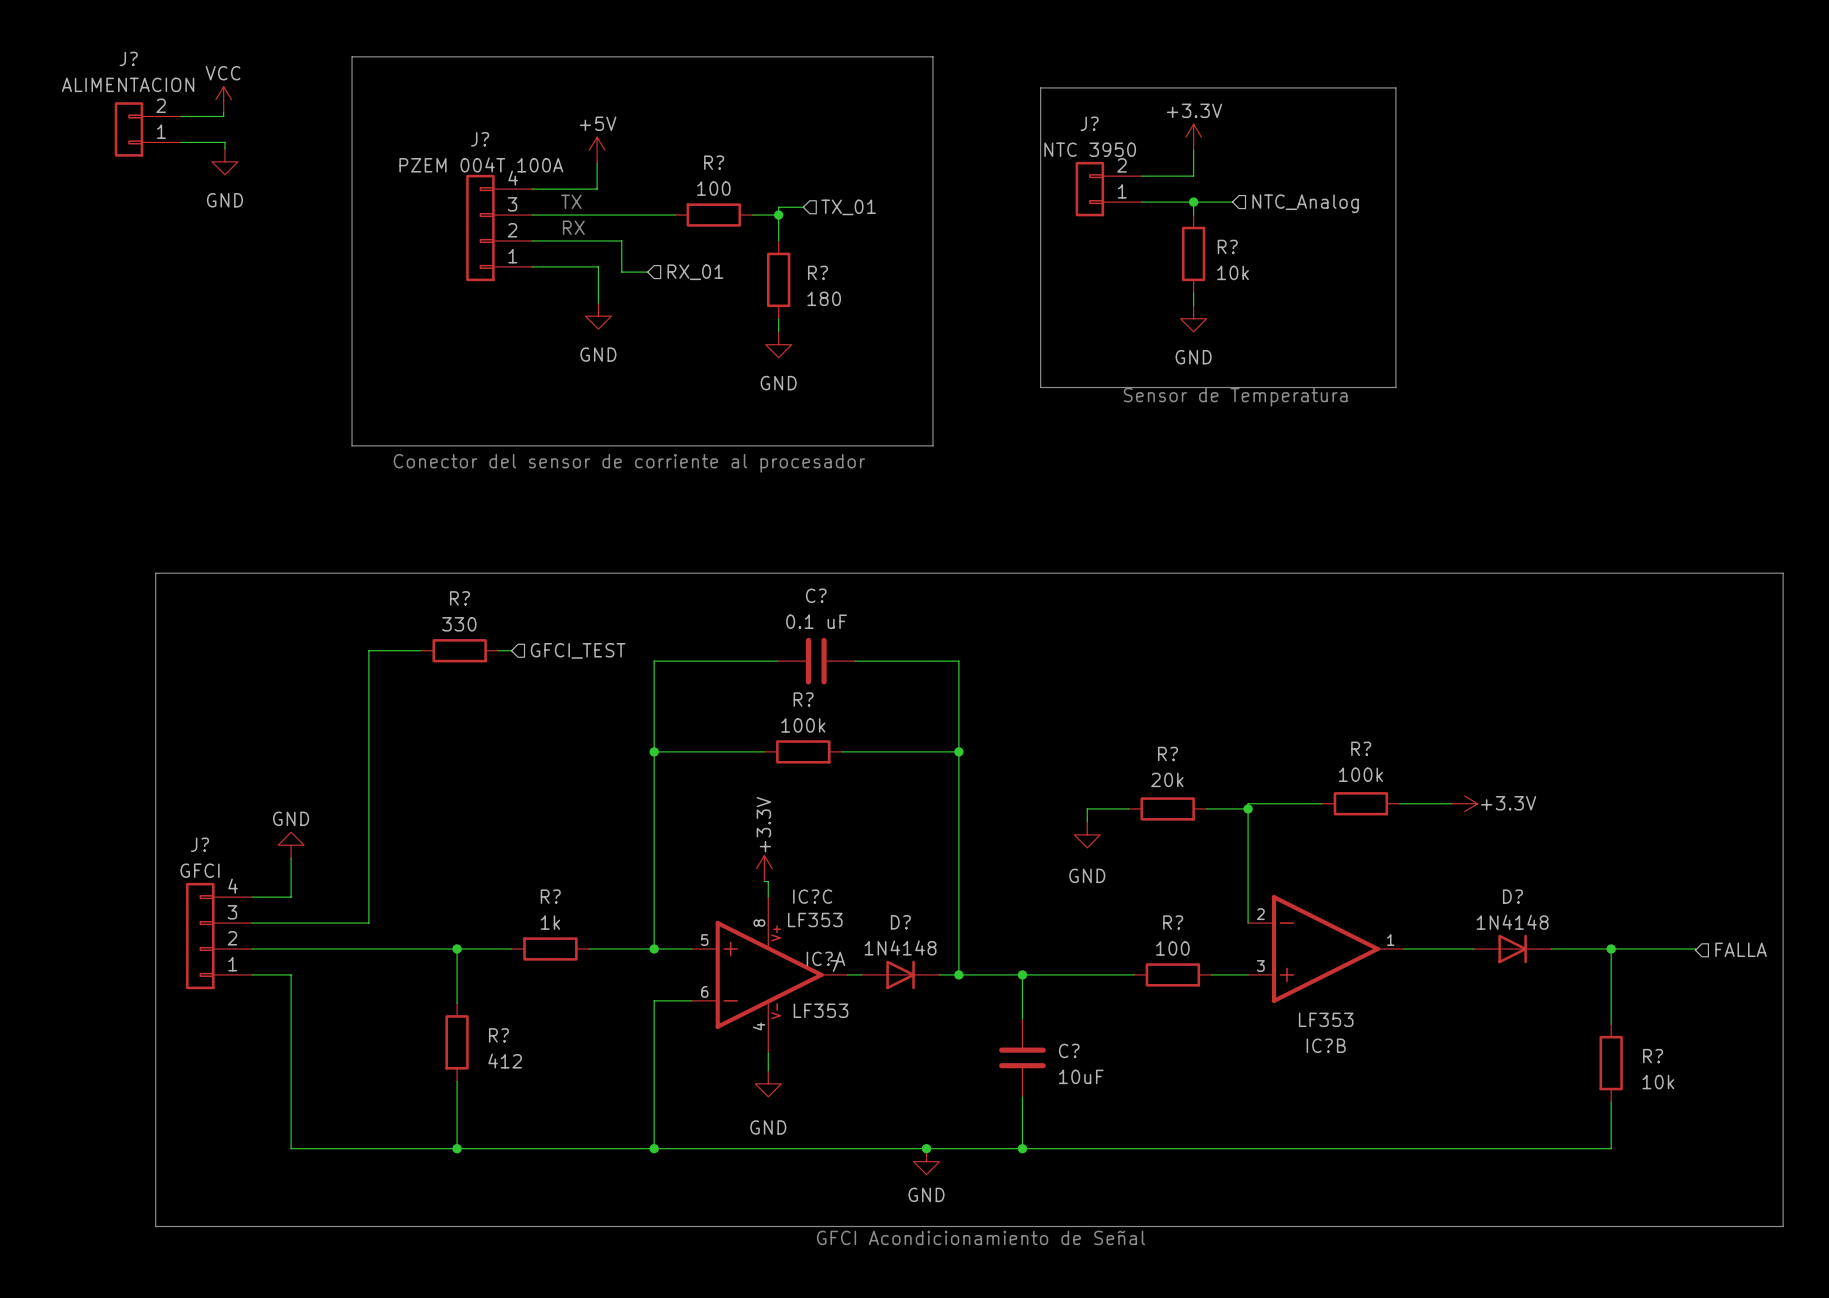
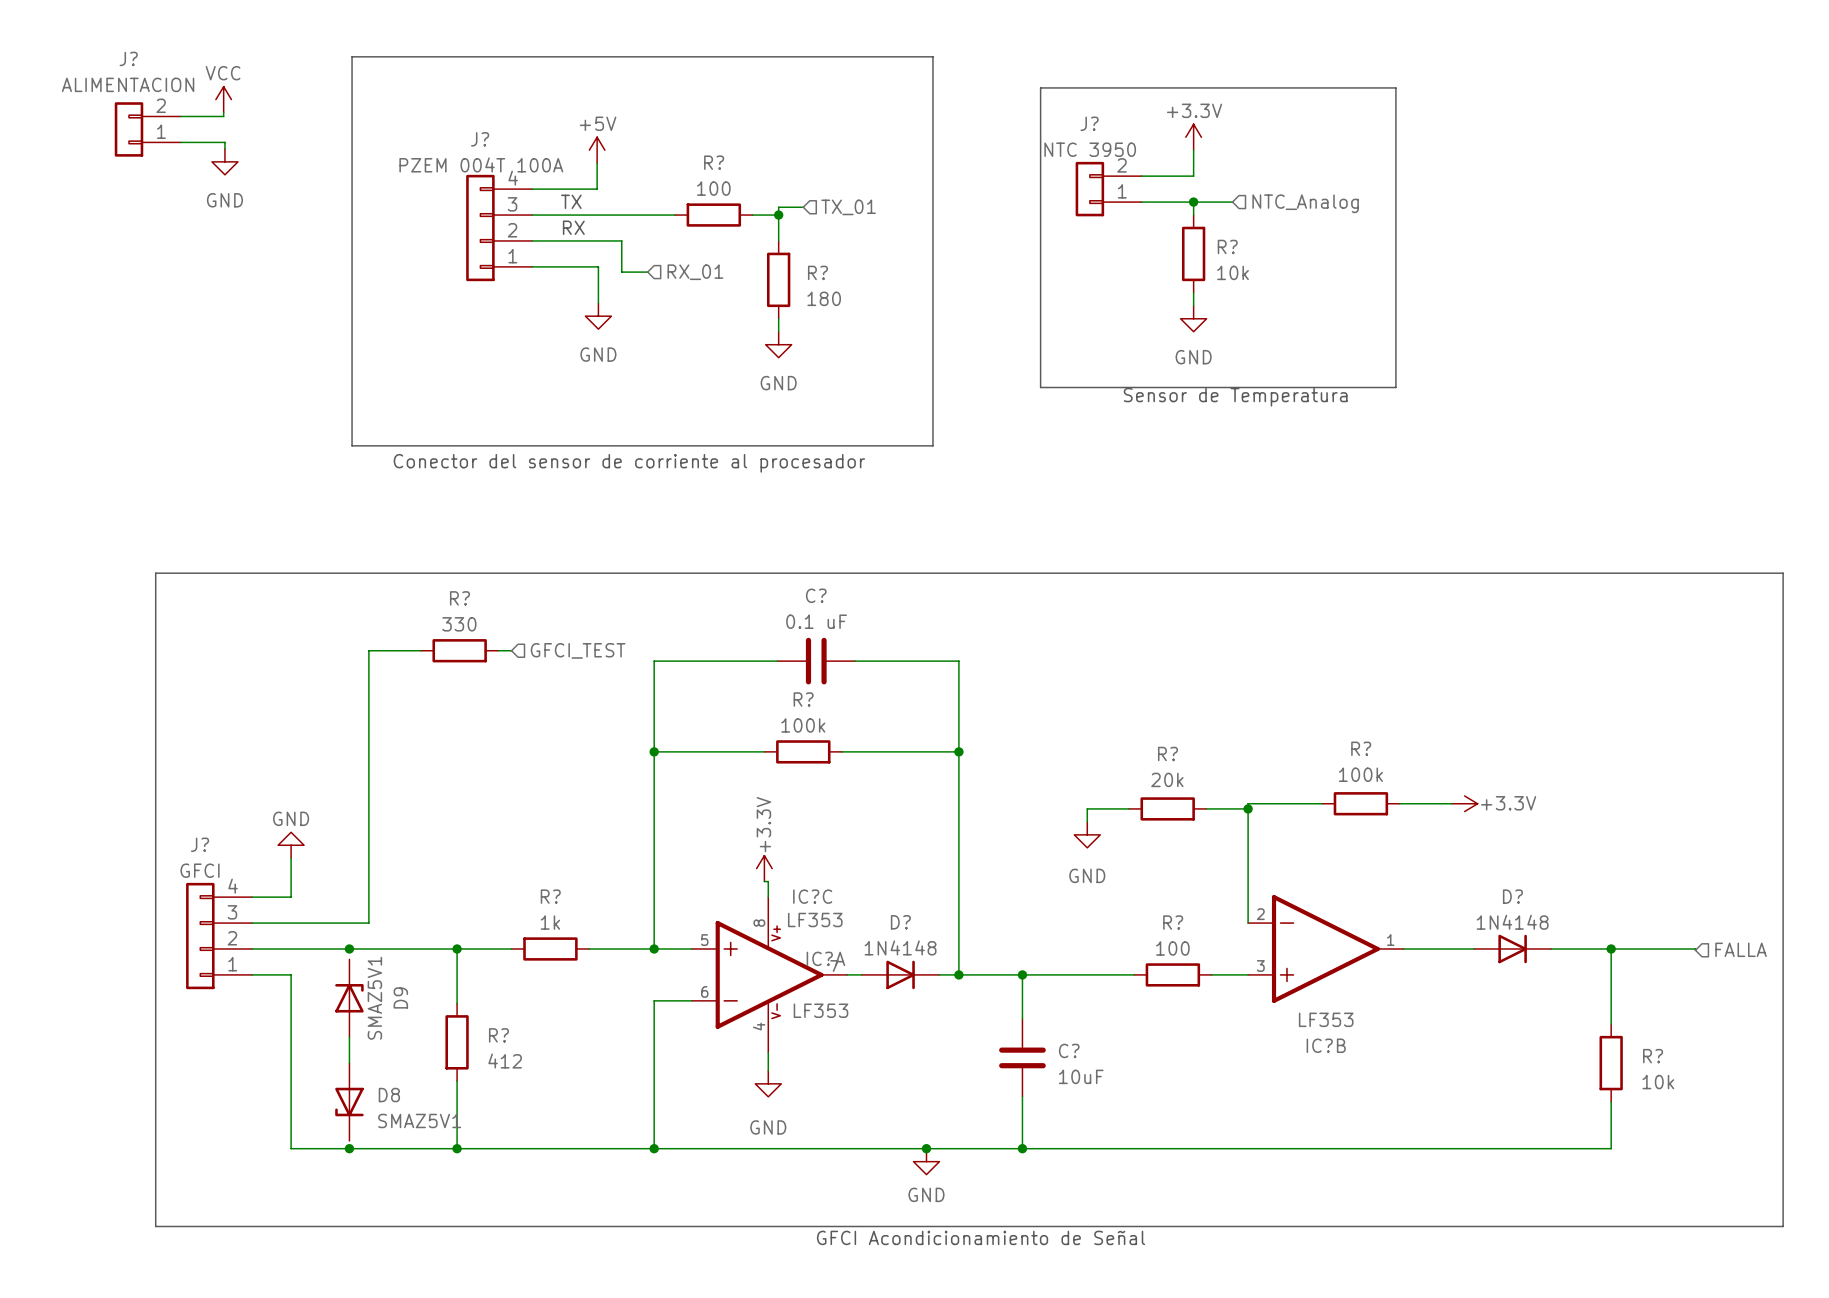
junction: none -> (349, 948)
D9: none -> SMAZ5V1 (349, 998)
wire: none -> (349, 1037) (349, 1063)
D8: none -> SMAZ5V1 (349, 1102)
junction: none -> (349, 1148)

